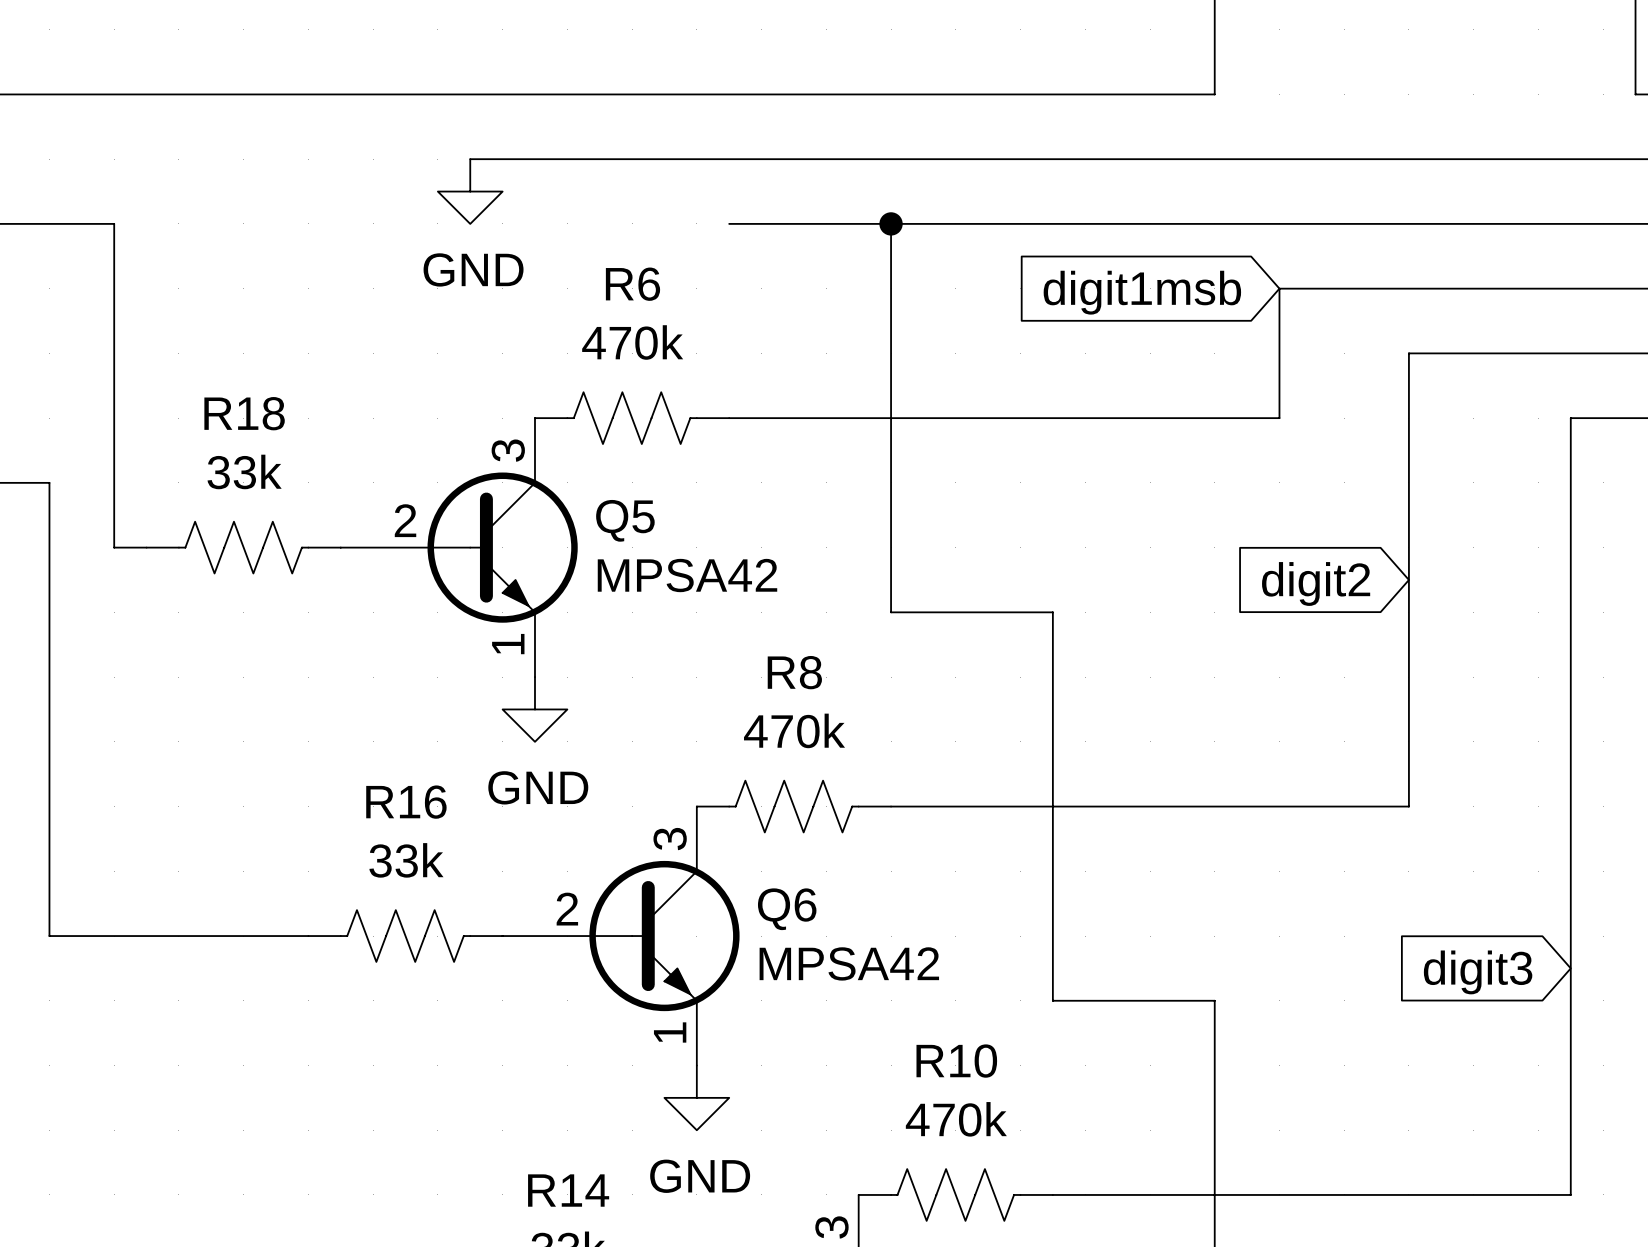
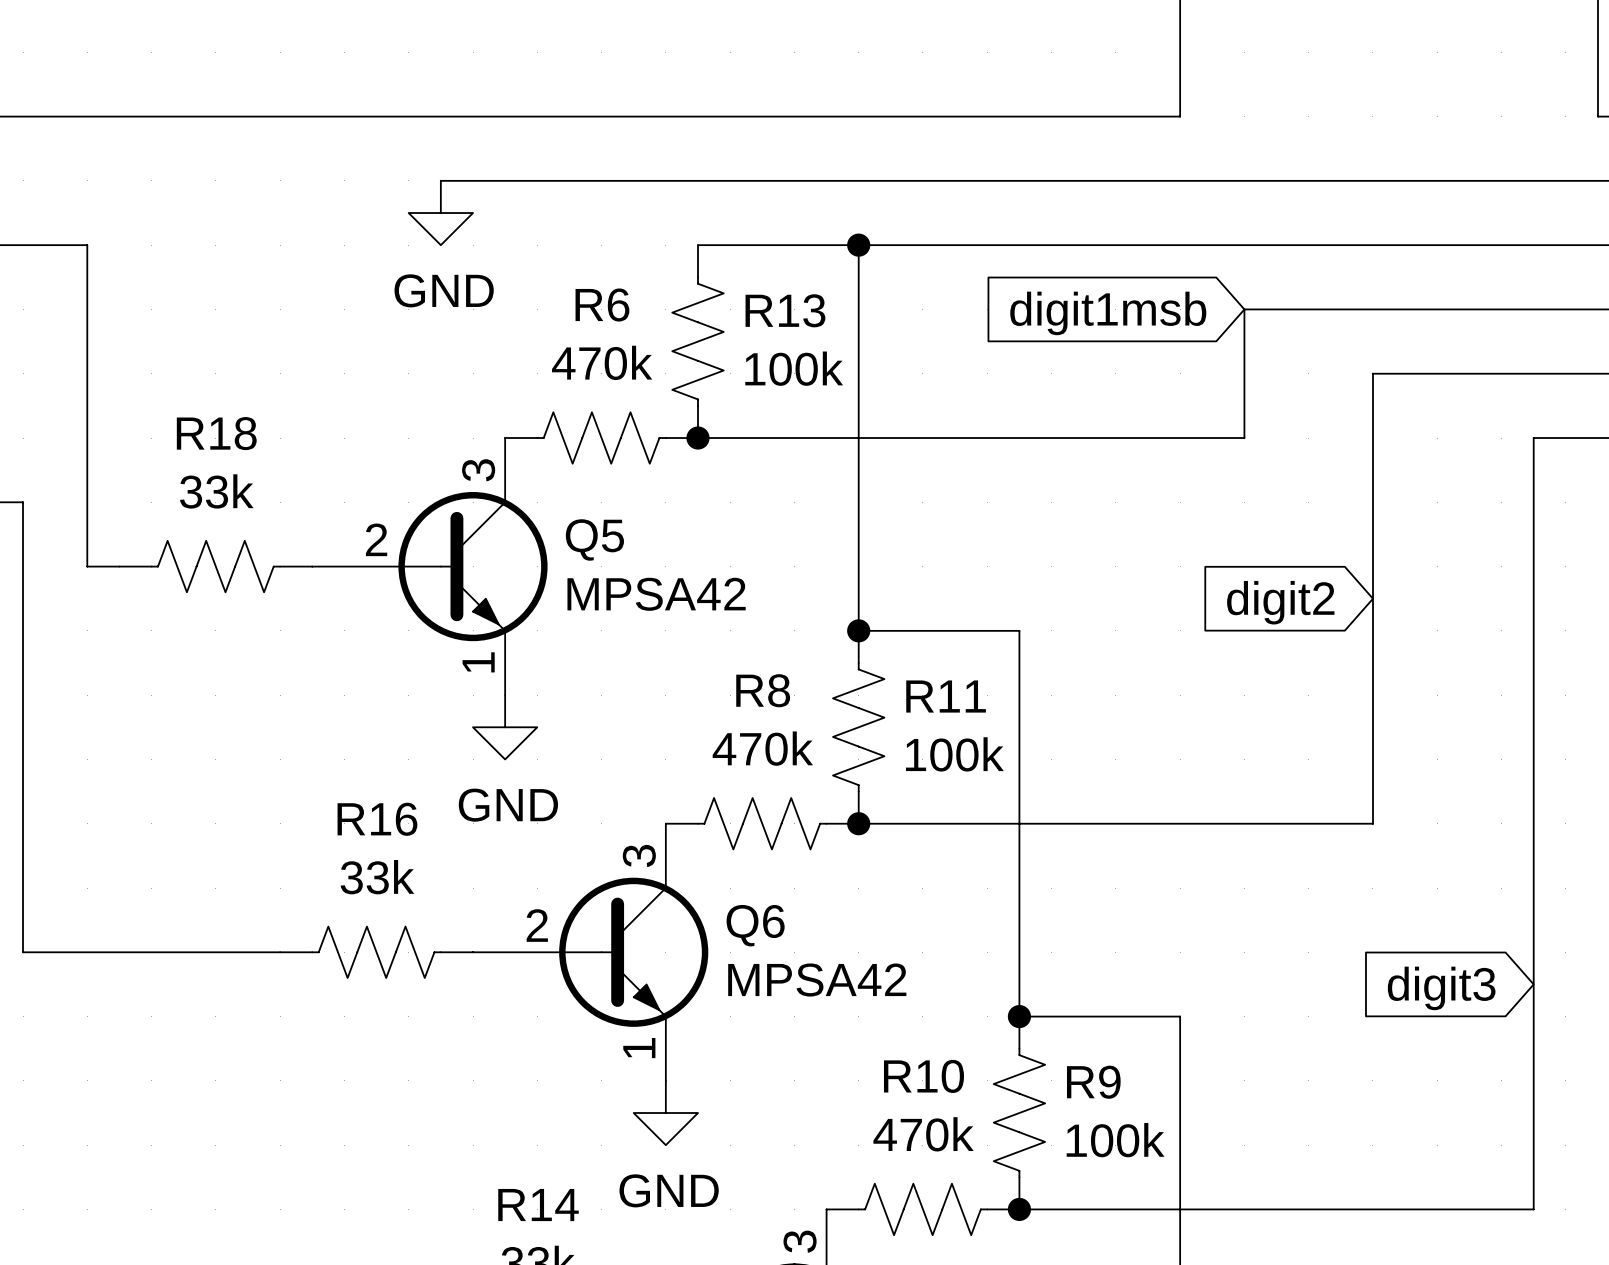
R13: none -> 100k (697, 341)
junction: none -> (697, 438)
junction: none -> (858, 630)
R11: none -> 100k (858, 727)
junction: none -> (858, 823)
junction: none -> (1019, 1016)
R9: none -> 100k (1019, 1113)
junction: none -> (1019, 1209)

